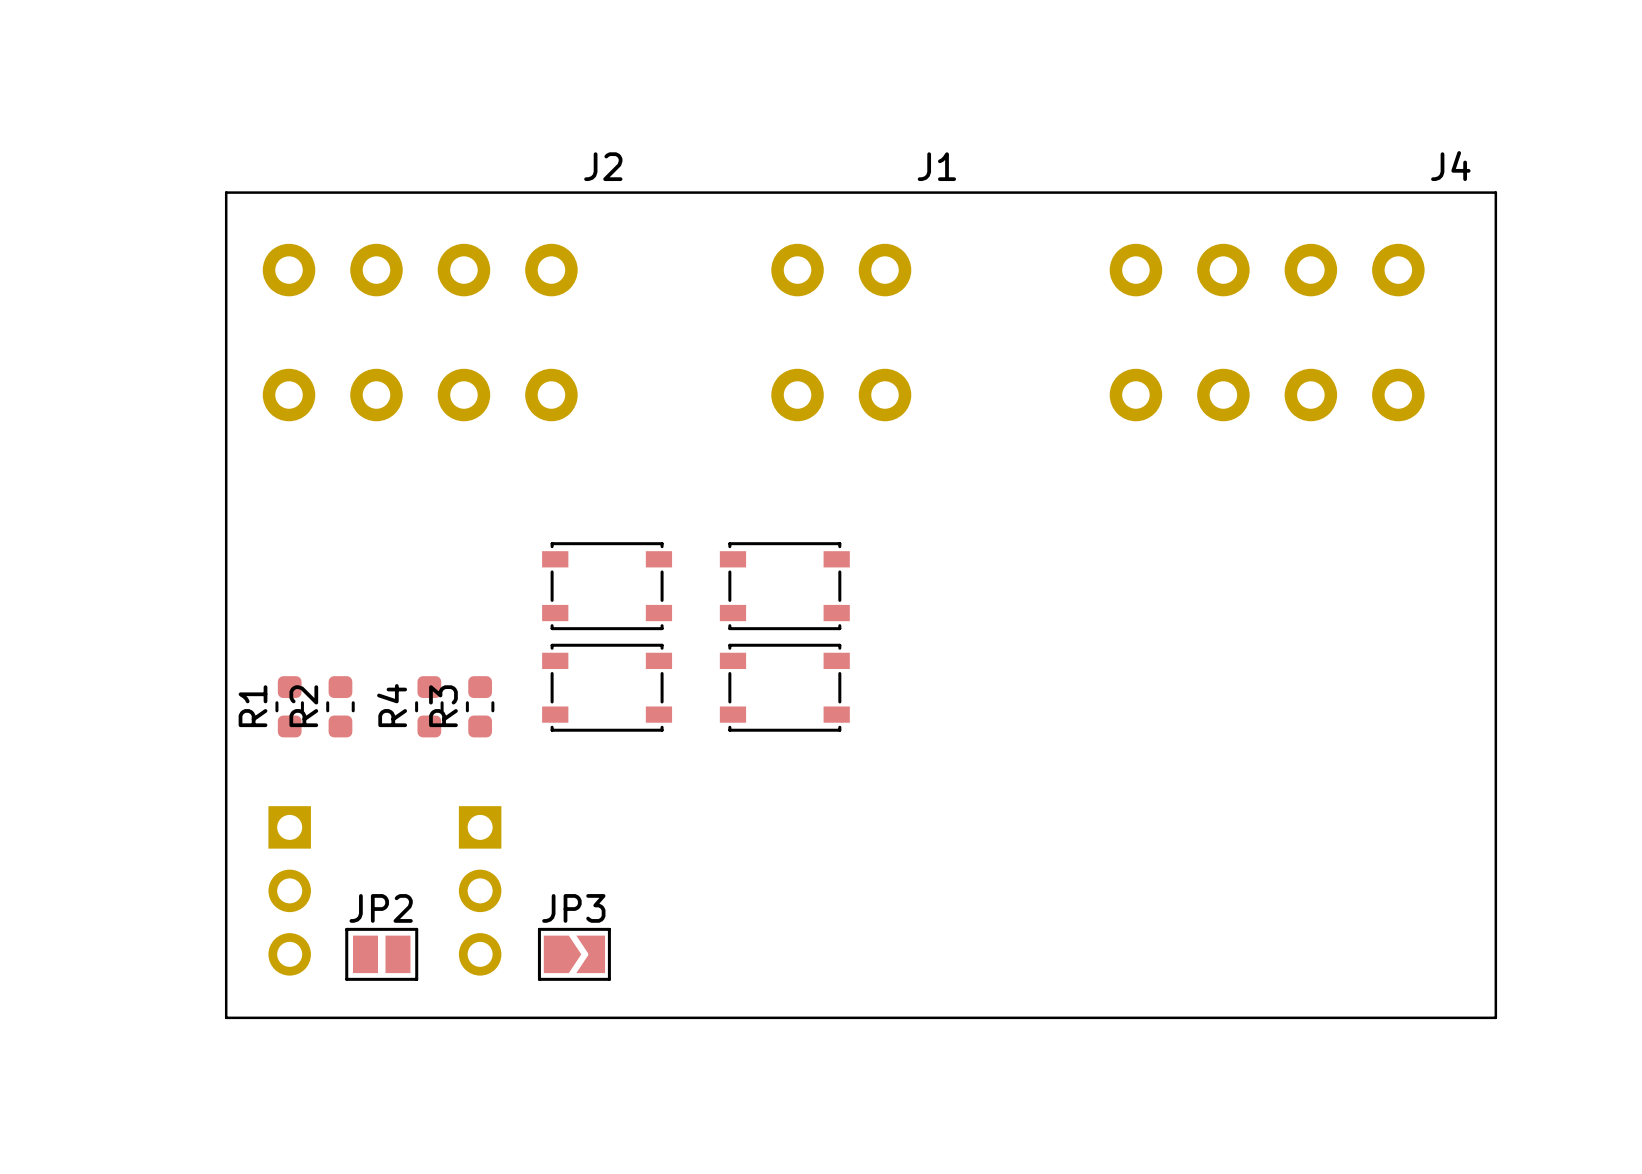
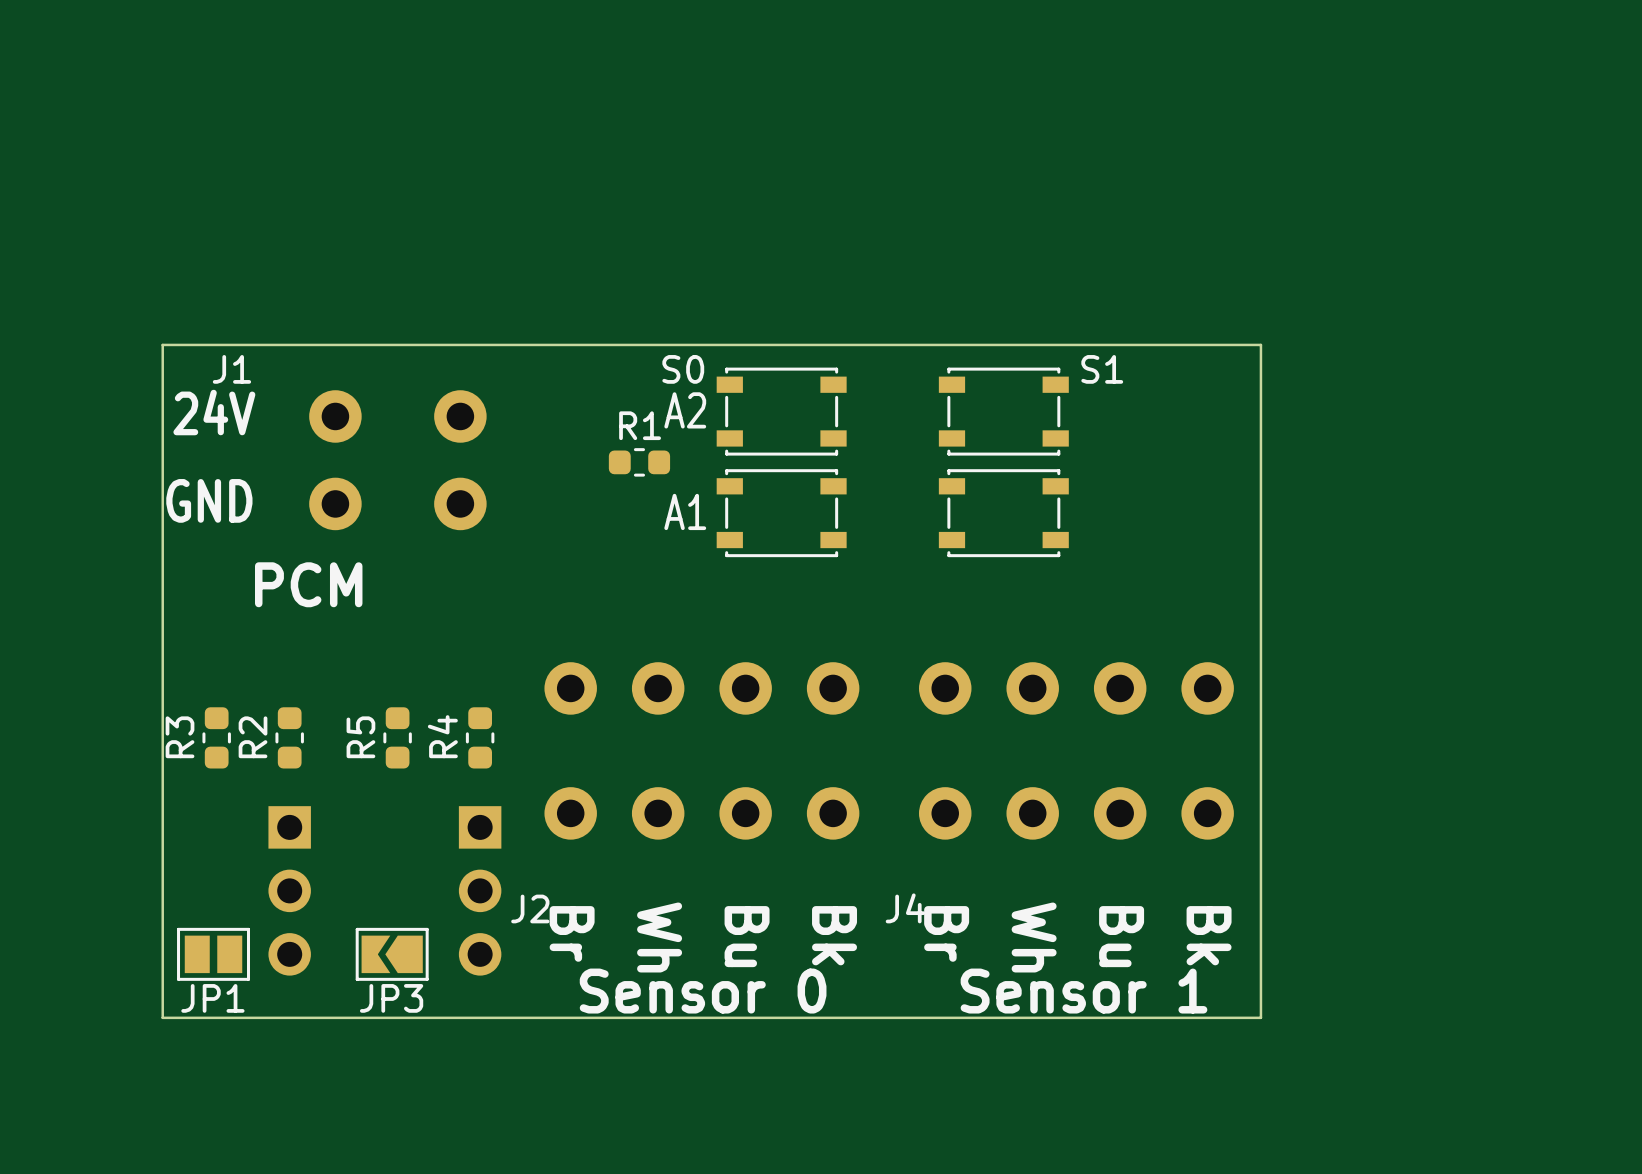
J2 name position: J2 (603, 166) -> J2 (530, 908)
J1 name position: J1 (936, 166) -> J1 (231, 369)
J4 name position: J4 (1450, 166) -> J4 (905, 908)
J2 position: (420, 332) -> (701, 750)
J1 rotation: 0° (841, 332) -> 90° clockwise (397, 460)
J1 position: (841, 332) -> (397, 460)
J4 position: (1267, 332) -> (1076, 750)
text: none -> S0 (683, 369)
text: none -> S1 (1102, 369)
text: none -> A2 (685, 410)
part: none -> (781, 411)
part: none -> (1003, 411)
text: none -> 24V (214, 412)
text: none -> GND (209, 500)
text: none -> A1 (685, 511)
part: none -> (1003, 513)
text: none -> PCM (308, 584)
part: (607, 586) -> none
part position: (784, 586) -> (781, 513)
part: (607, 687) -> none
part: (784, 687) -> none
R1 rotation: 0° (289, 706) -> 90° clockwise (639, 462)
R1 position: (289, 706) -> (639, 462)
R2 position: (340, 706) -> (289, 737)
R4 position: (429, 706) -> (480, 737)
R3 position: (480, 706) -> (216, 737)
R5: none -> (397, 737)
text: none -> Br (572, 933)
text: none -> Br (946, 933)
text: none -> Bk (834, 935)
text: none -> Bk (1209, 935)
text: none -> Bu (747, 936)
text: none -> Bu (1121, 936)
text: none -> Wh (659, 937)
text: none -> Wh (1034, 937)
JP1: none -> (213, 954)
JP2: (381, 954) -> none
JP3 rotation: 0° (574, 954) -> 180° (392, 954)
JP3 position: (574, 954) -> (392, 954)
text: none -> Sensor 0 (703, 991)
text: none -> Sensor 1 (1083, 991)
board edge: (226, 1017) (226, 192) (1495, 192) (1495, 1017) (1260, 1017) -> (226, 1017) (162, 1017) (162, 344) (1260, 344) (1260, 1017)

